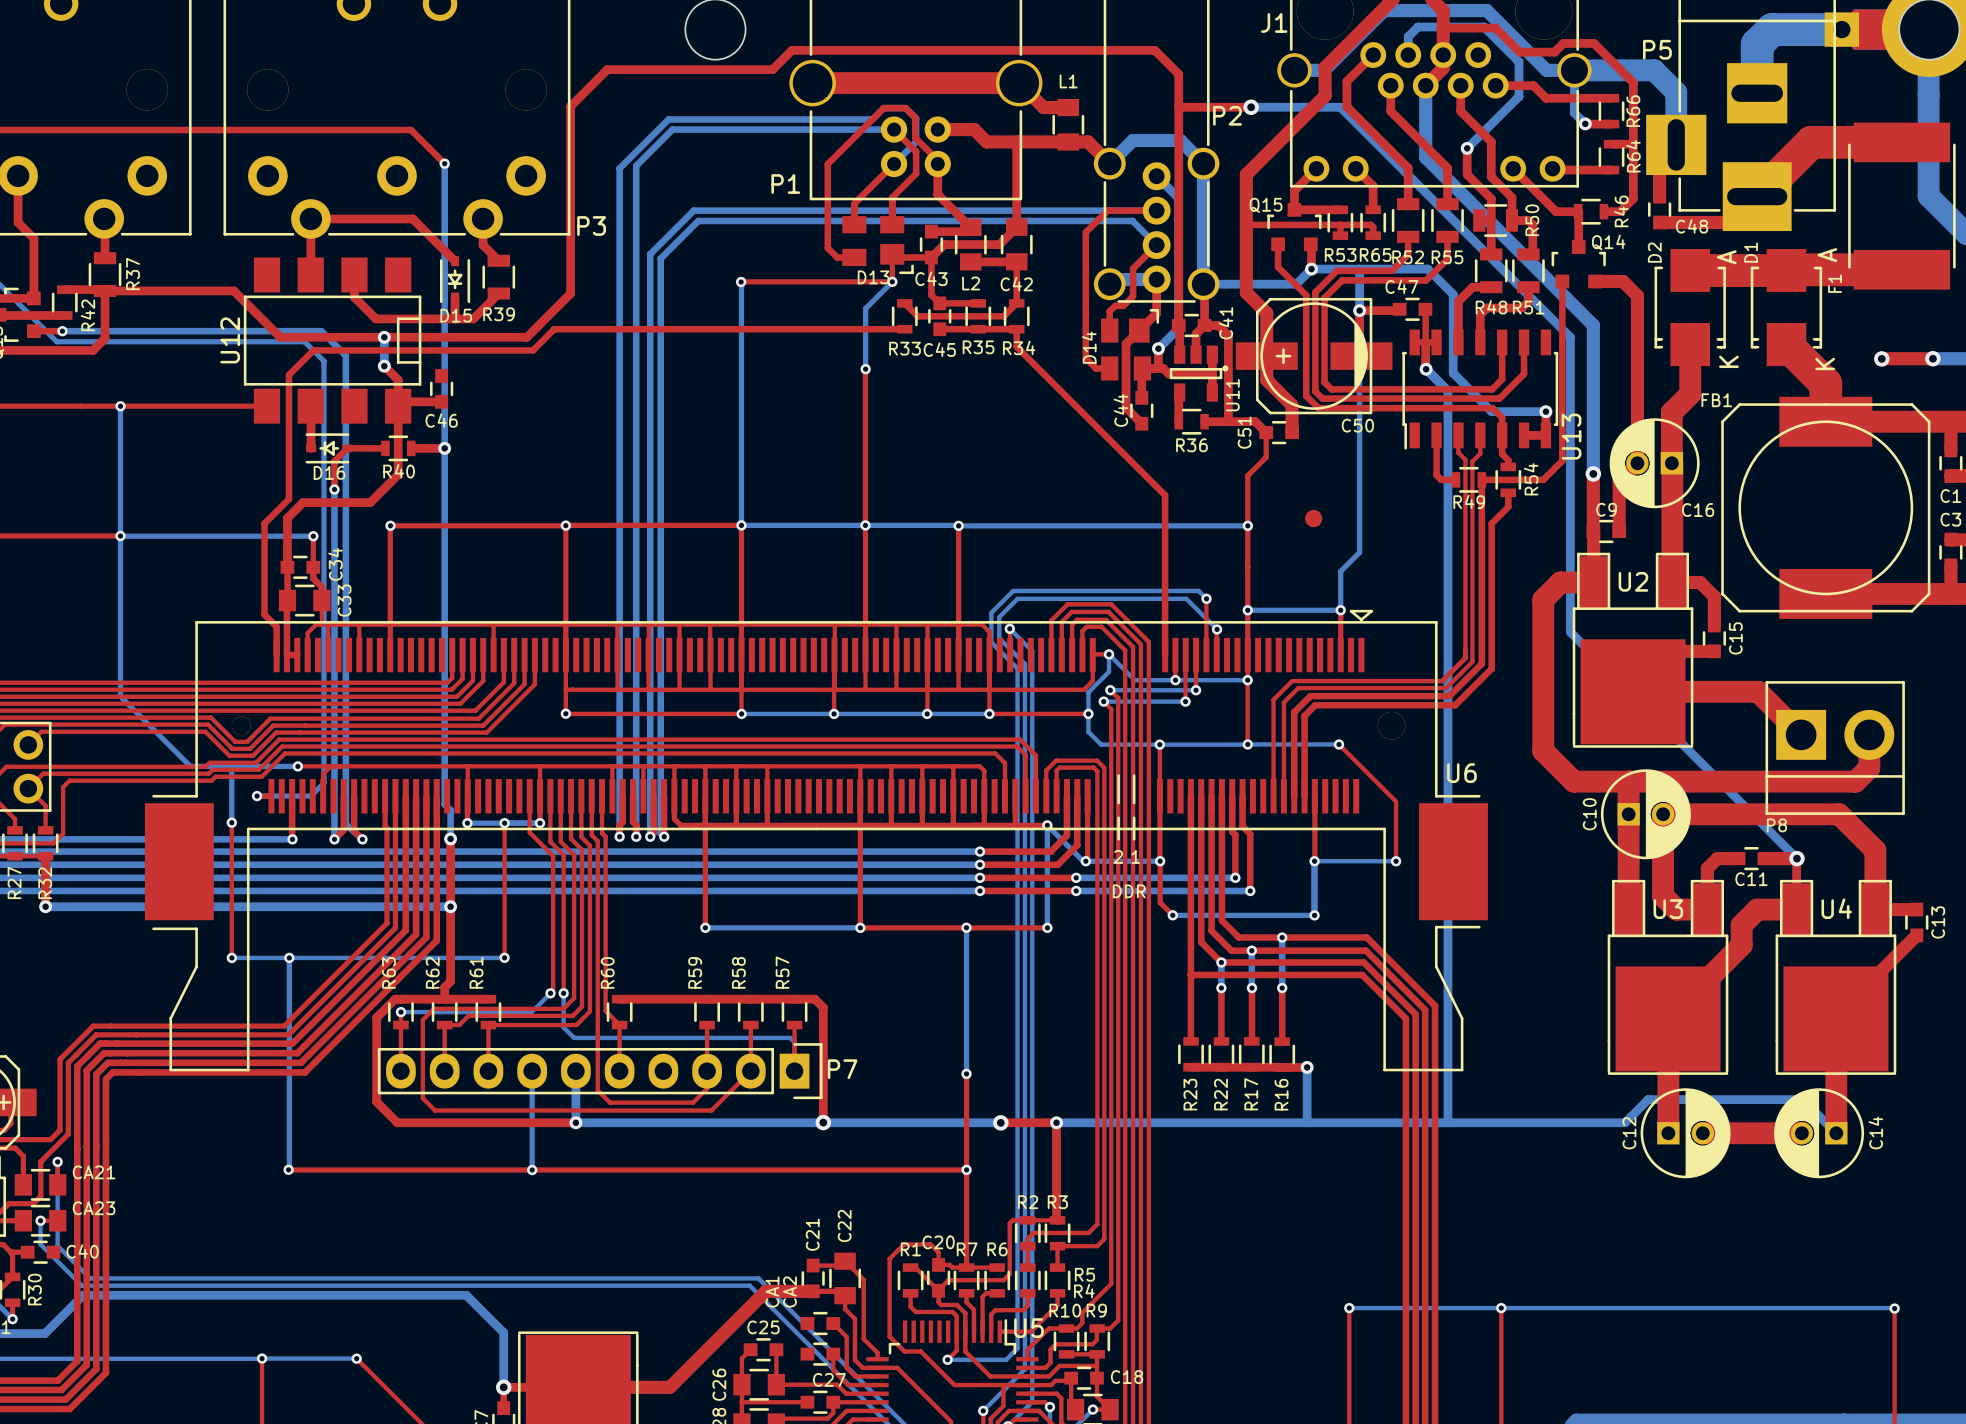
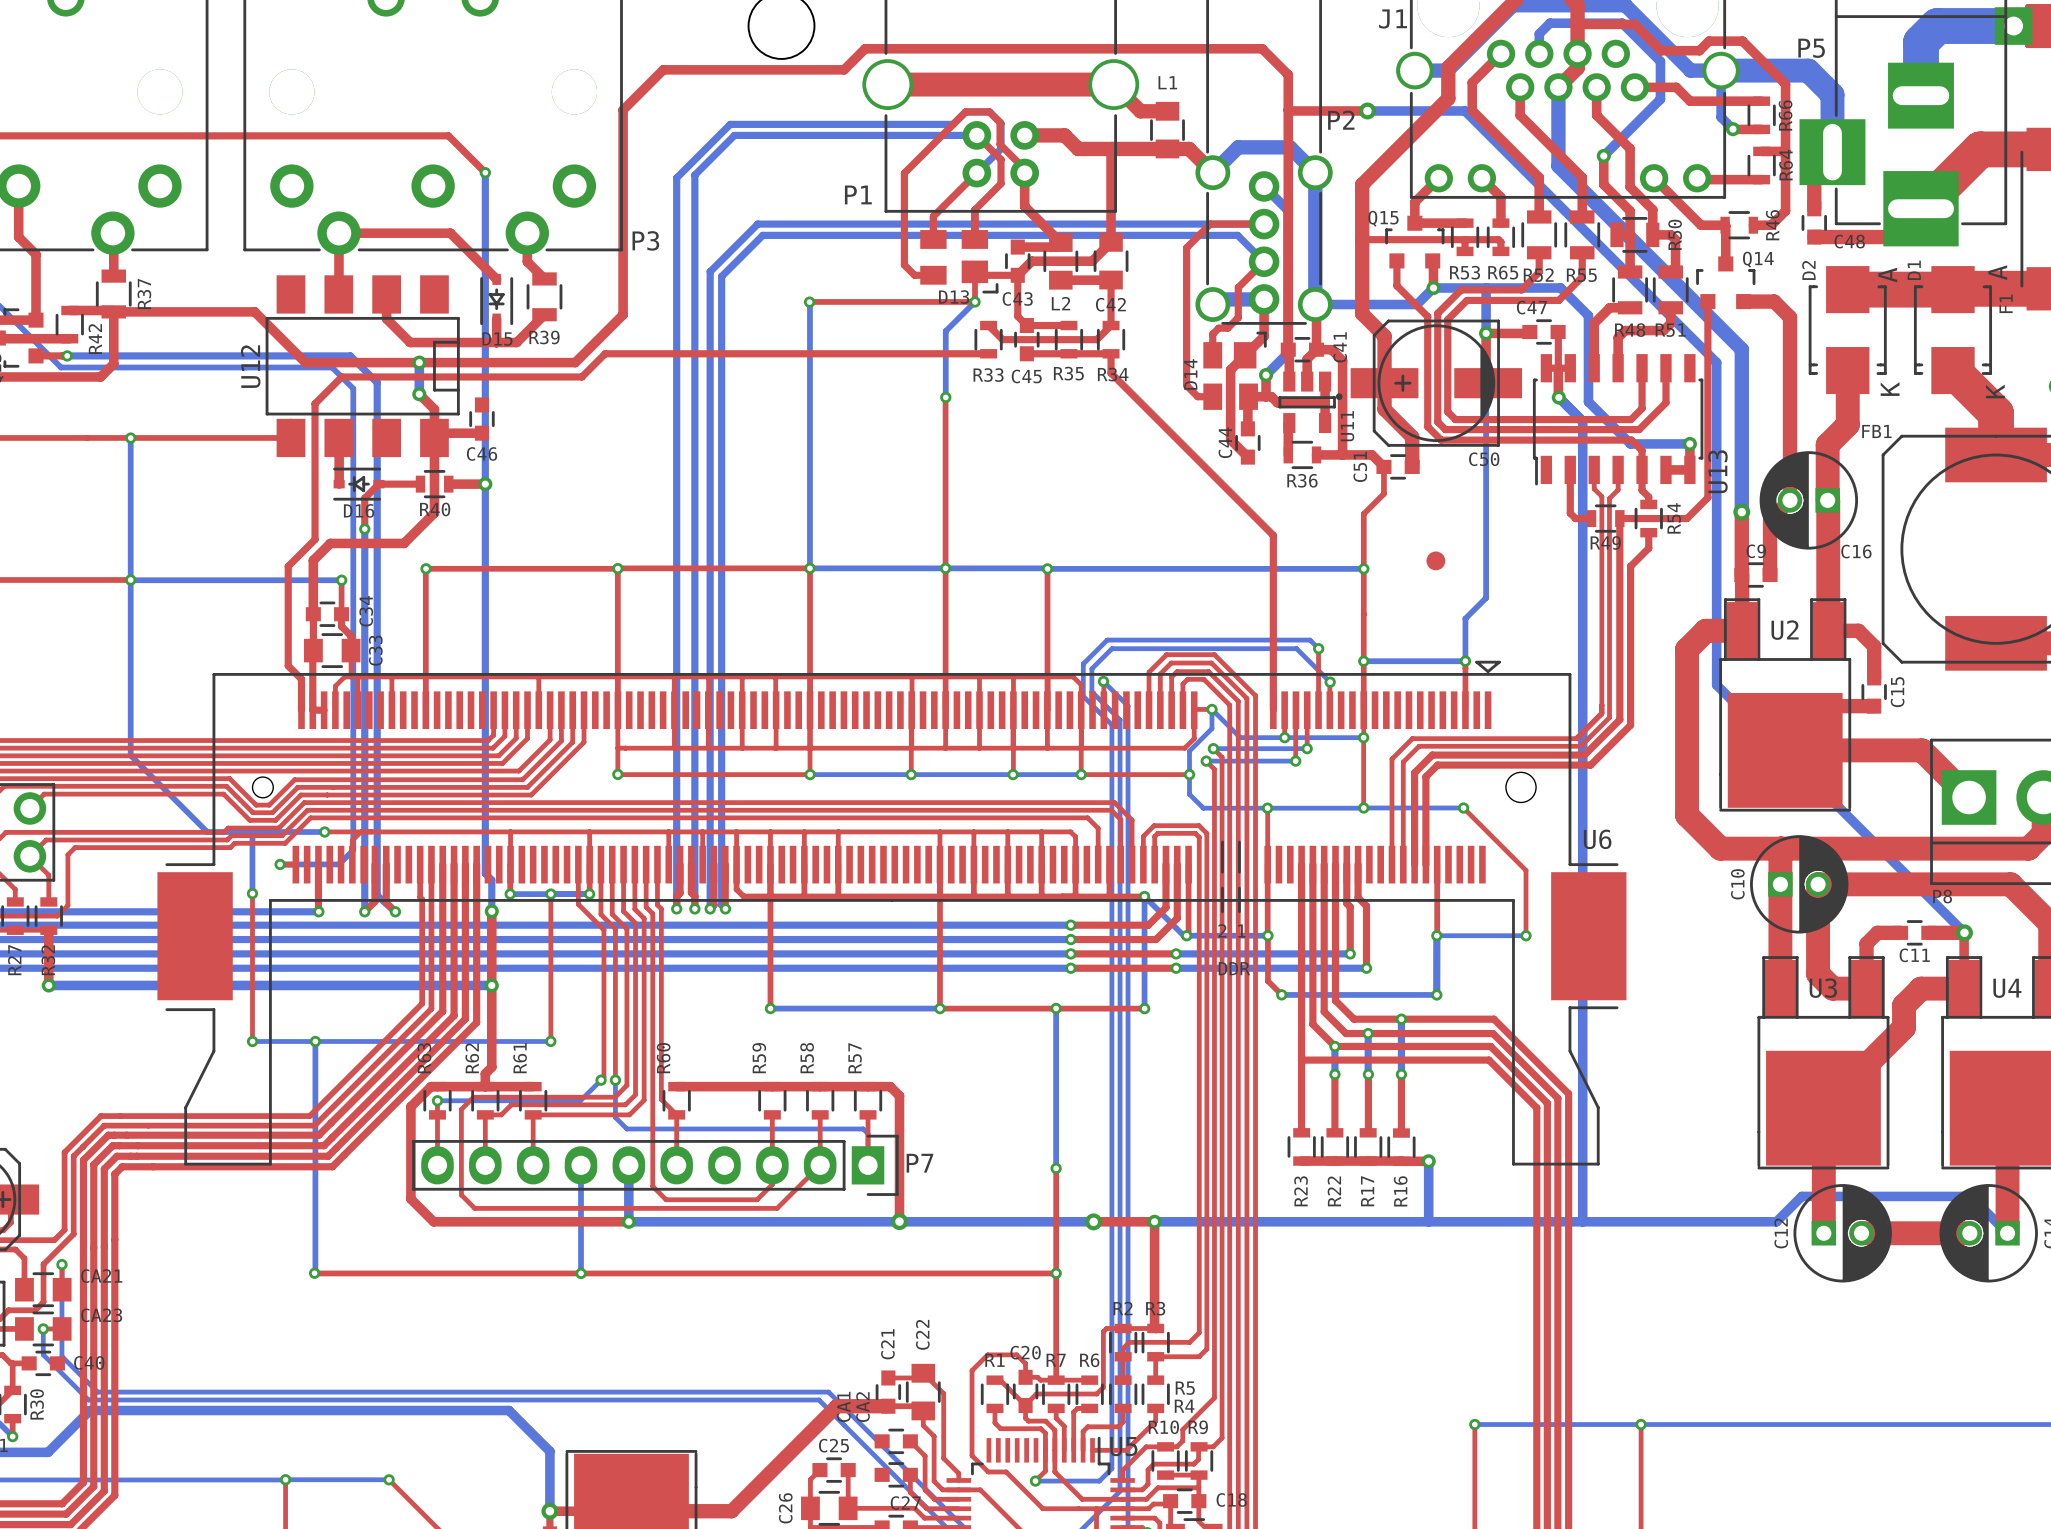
U6 footprint: [144, 609, 1488, 1072] -> [157, 660, 1627, 1166]

